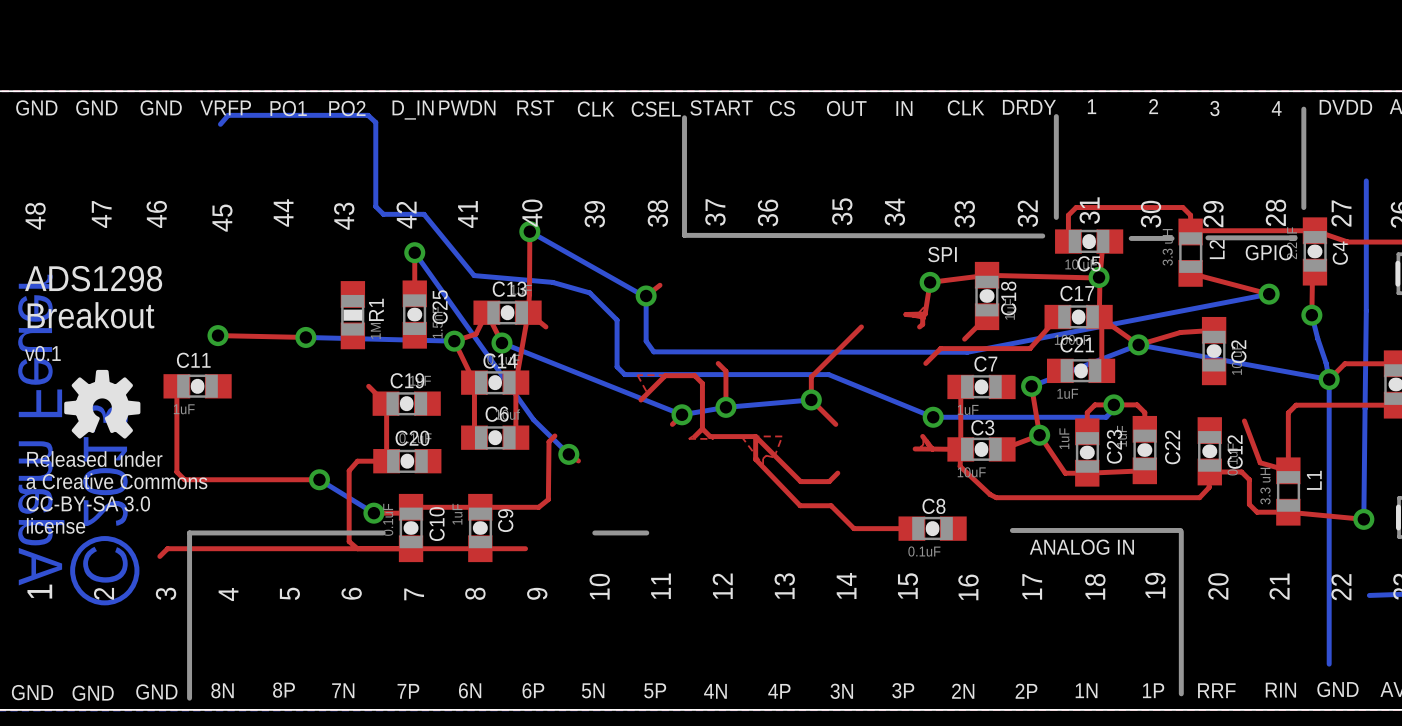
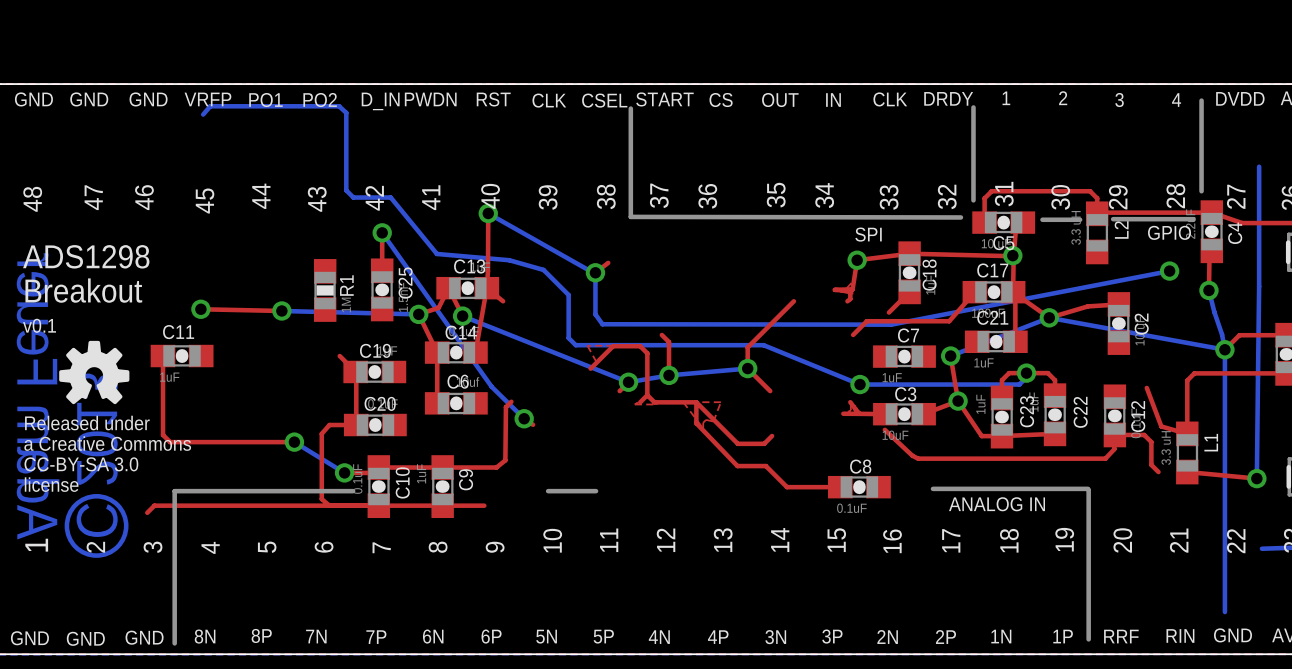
top track: (1190, 273) (1269, 294) -> none
top track: (515, 382) (515, 437) -> none
top track: (960, 386) (960, 466) -> none
top track: (1257, 512) (1288, 512) -> none

